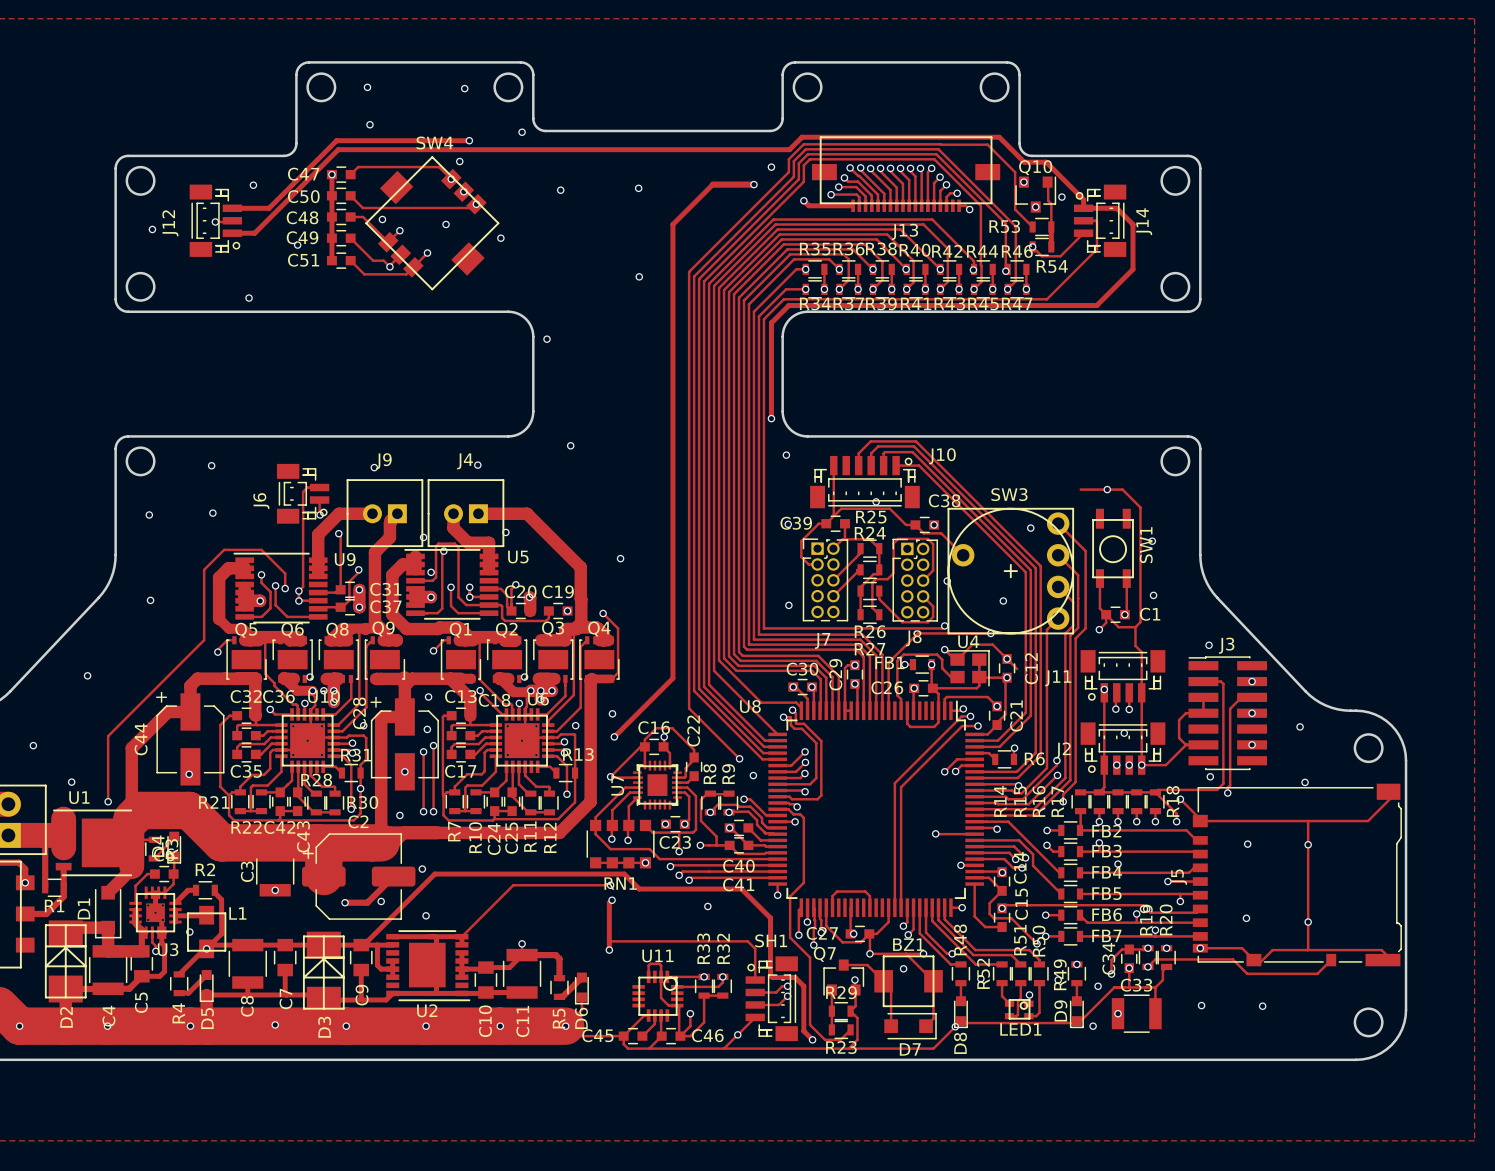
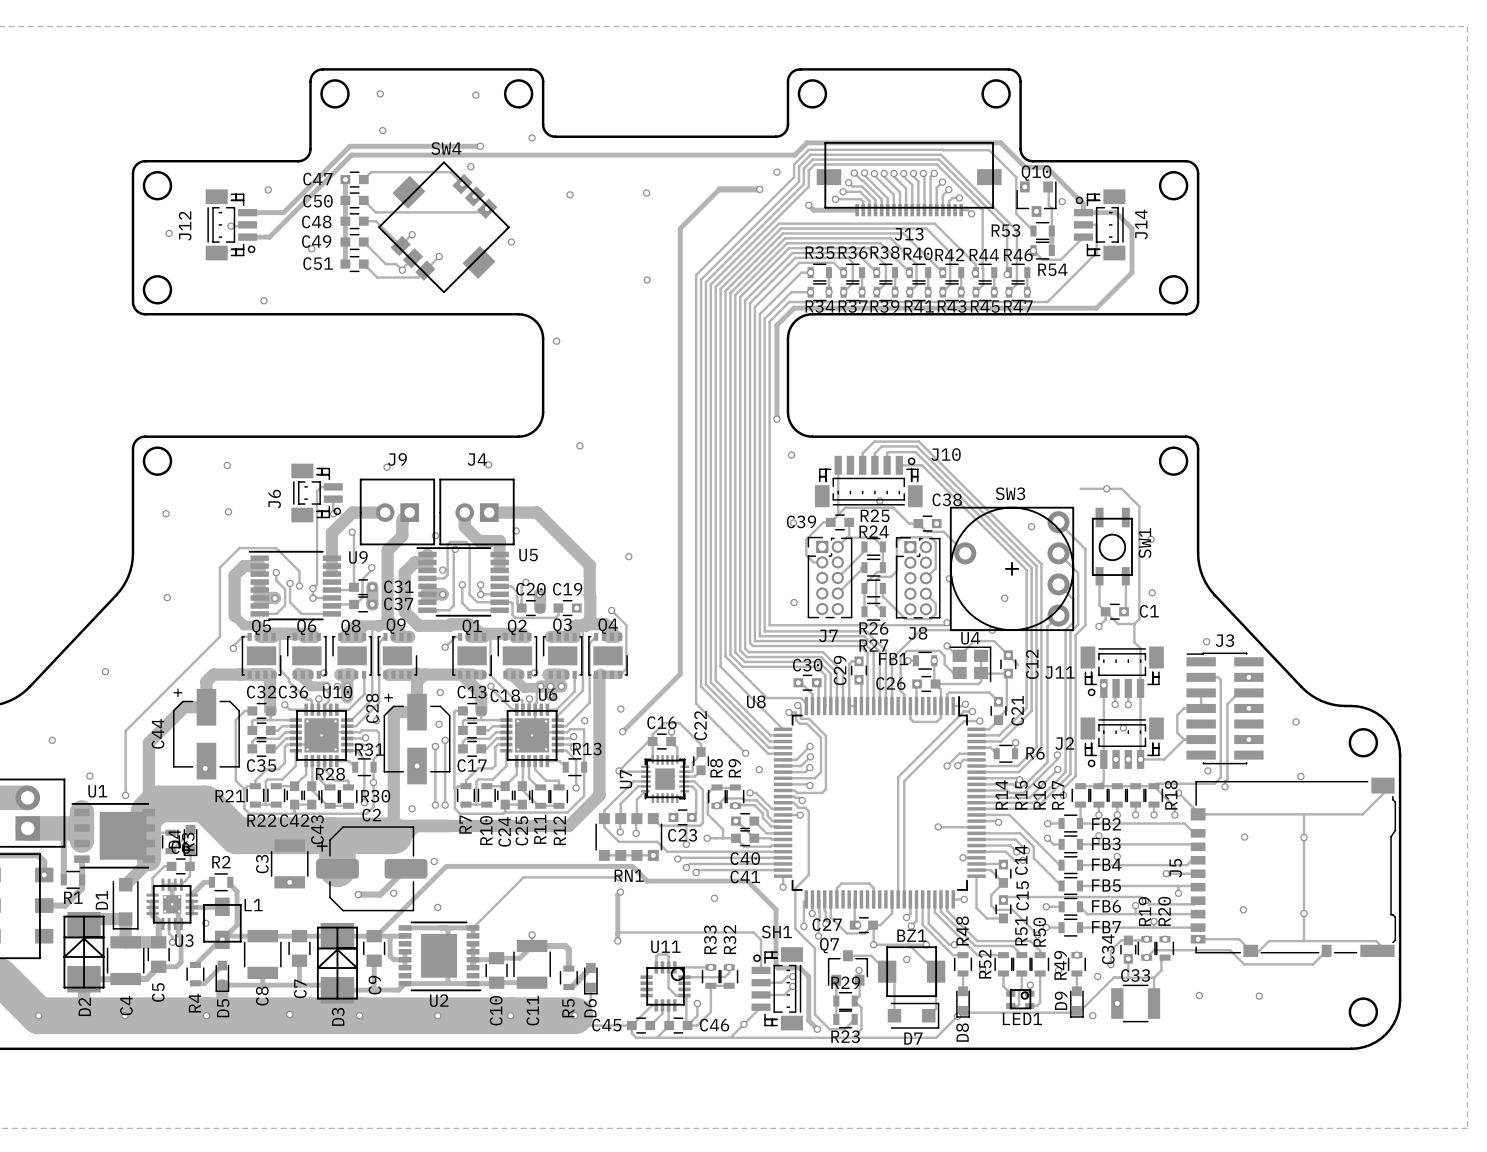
via: (382, 219) -> none
via: (446, 224) -> none

